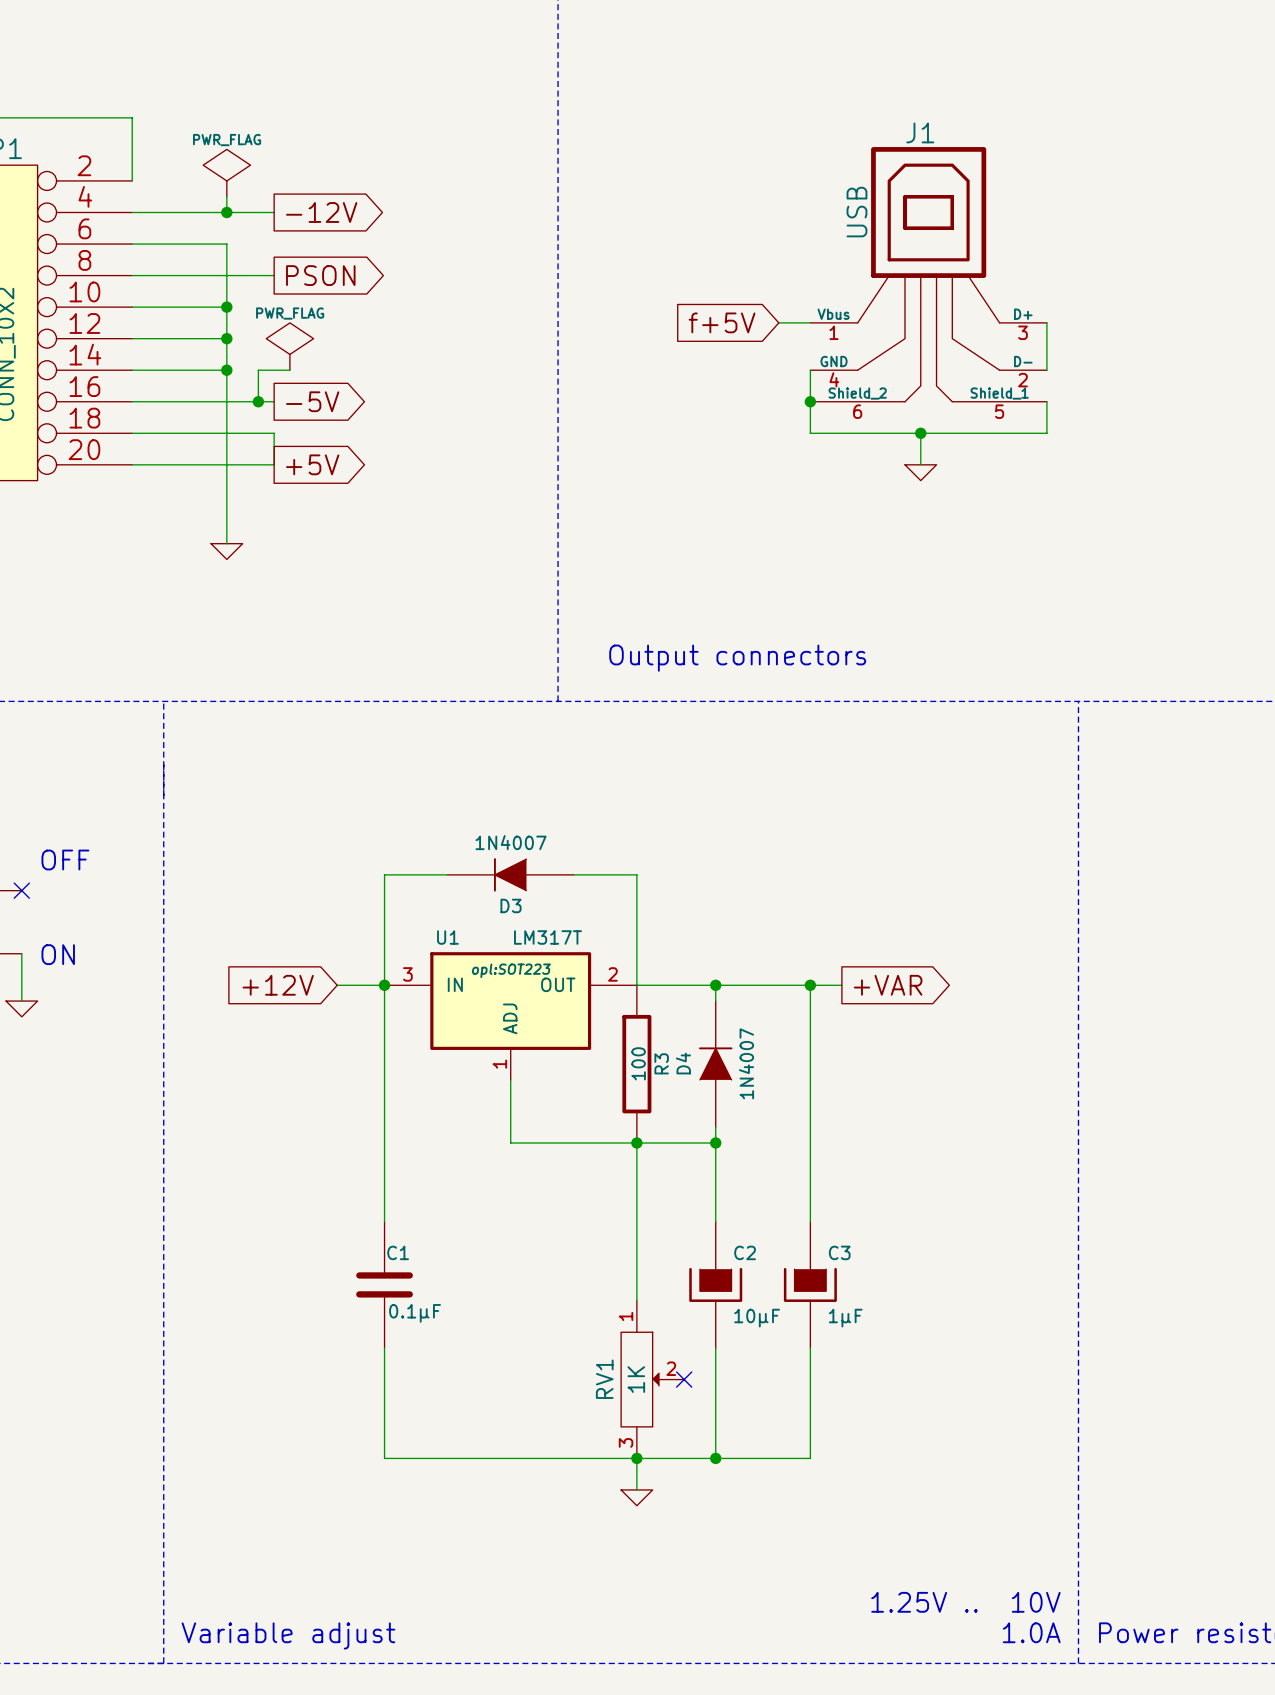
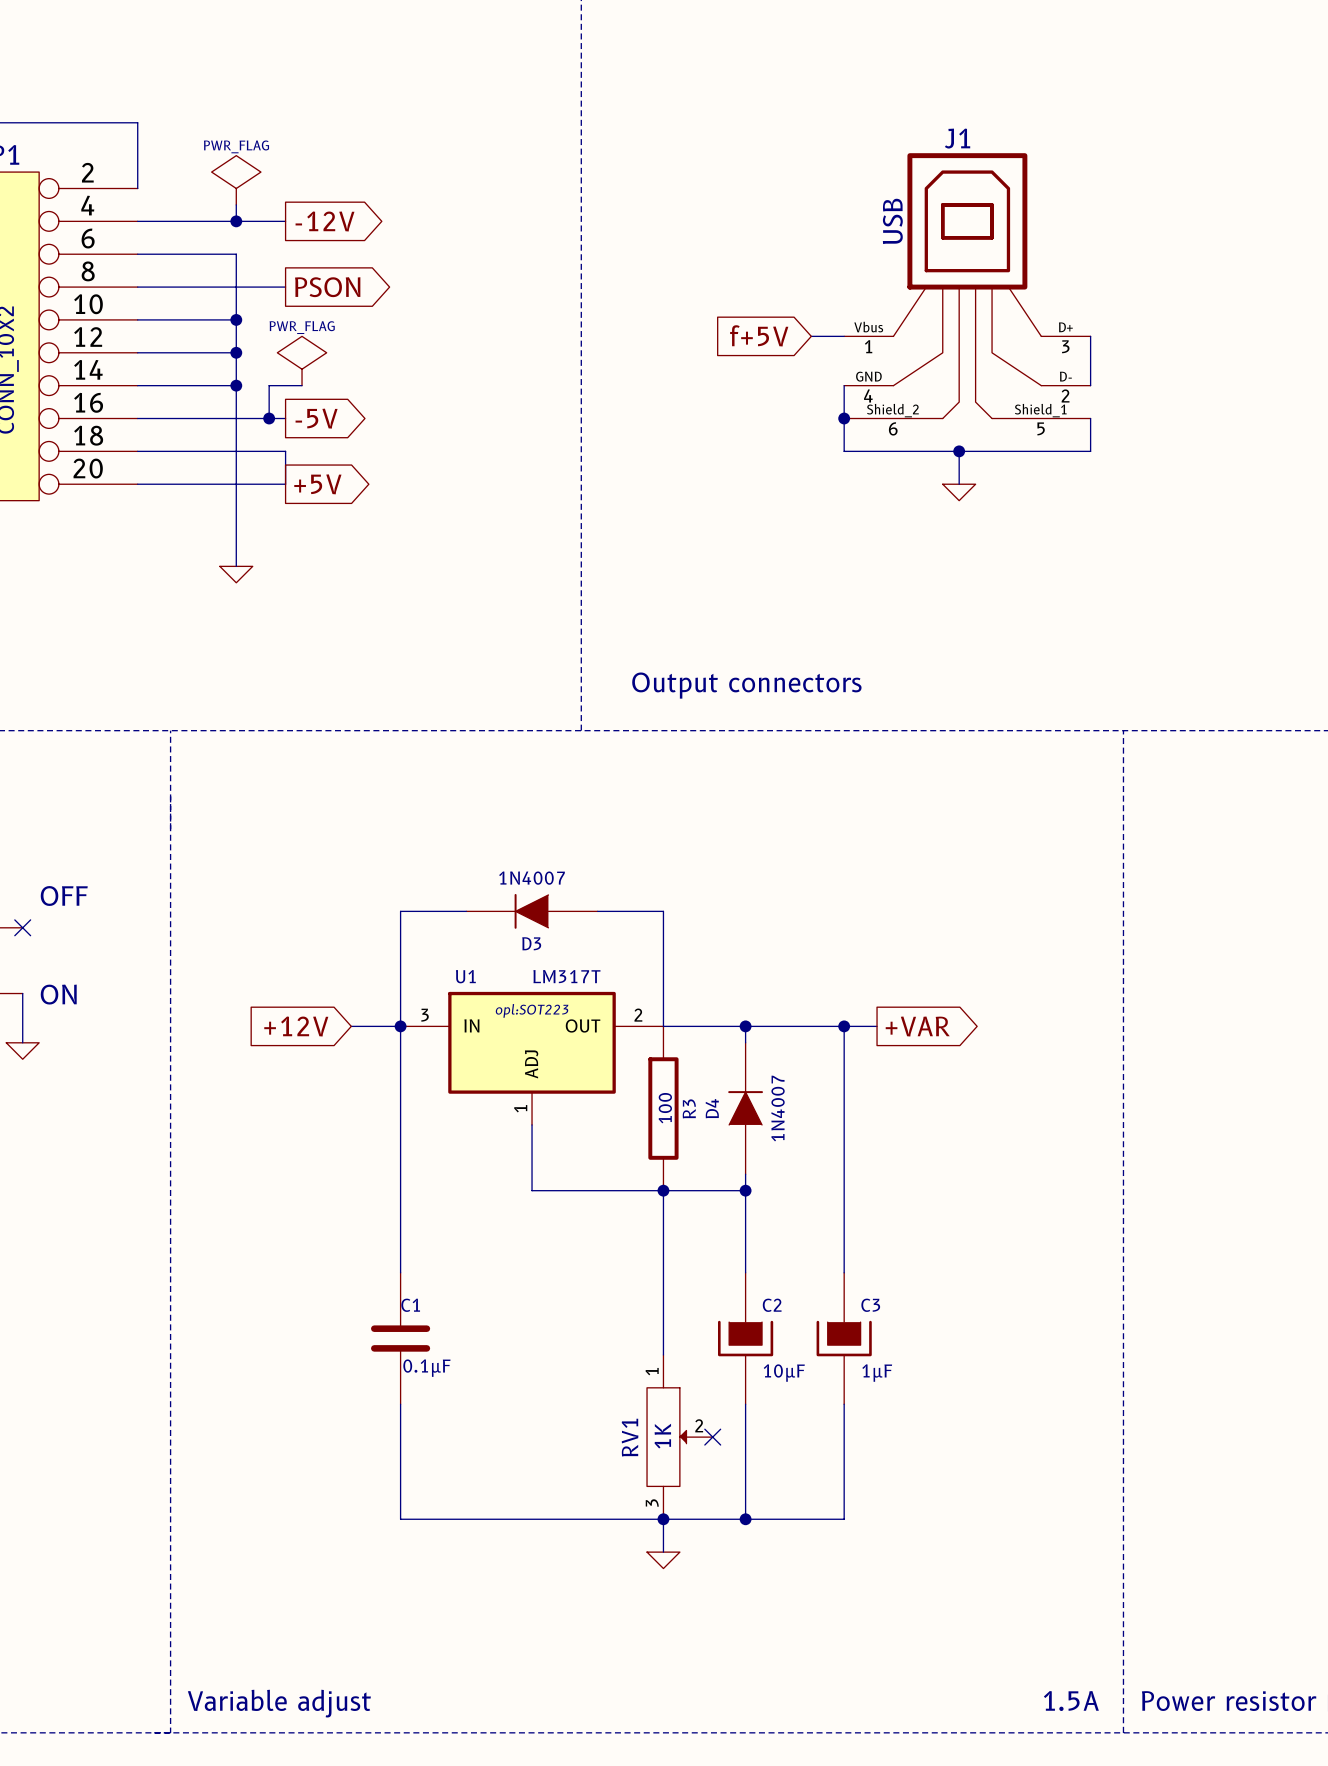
text: 1.25V .. 10V (965, 1602) -> none
text: 1.0A (1031, 1632) -> 1.5A (1071, 1701)

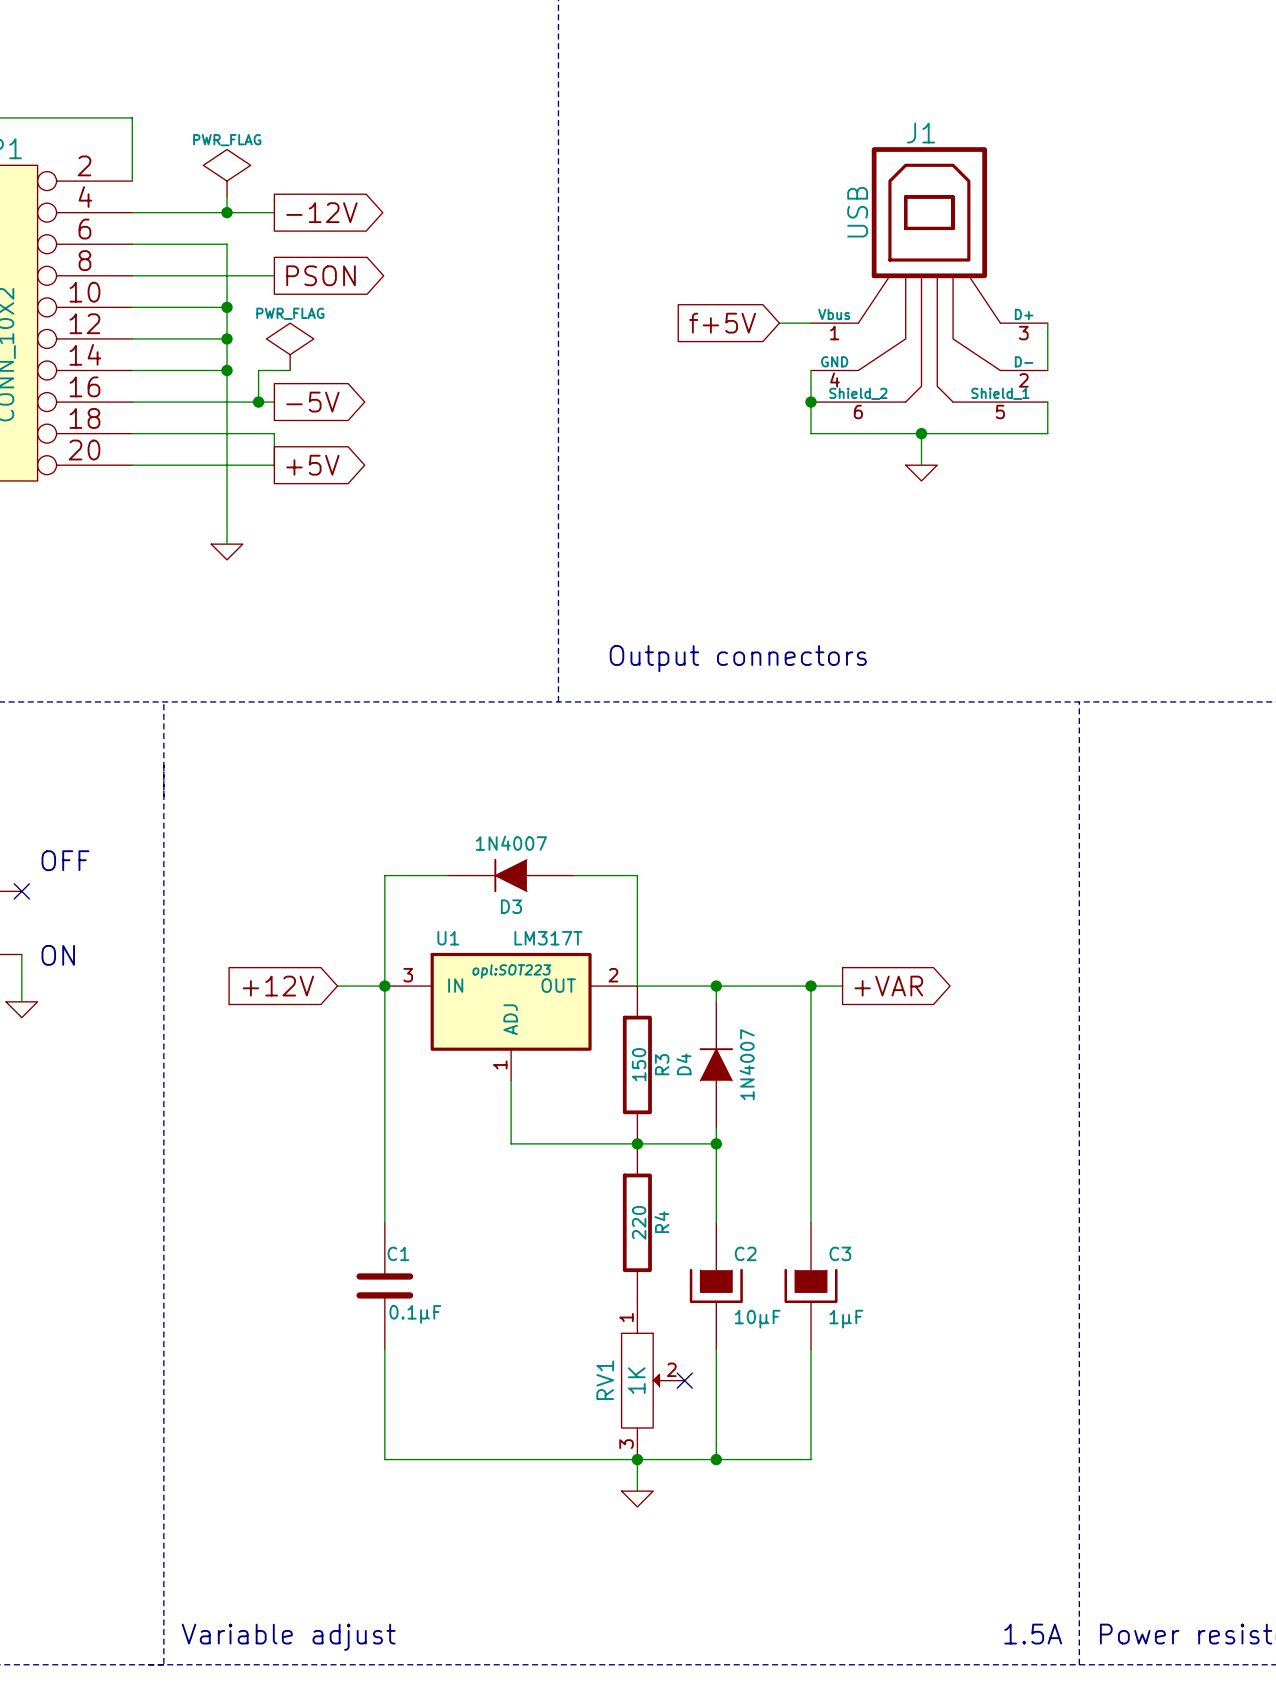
R3 value: 100 (665, 1108) -> 150 (639, 1064)
wire: (663, 1190) (663, 1354) -> none
R4: none -> 220 (637, 1222)

